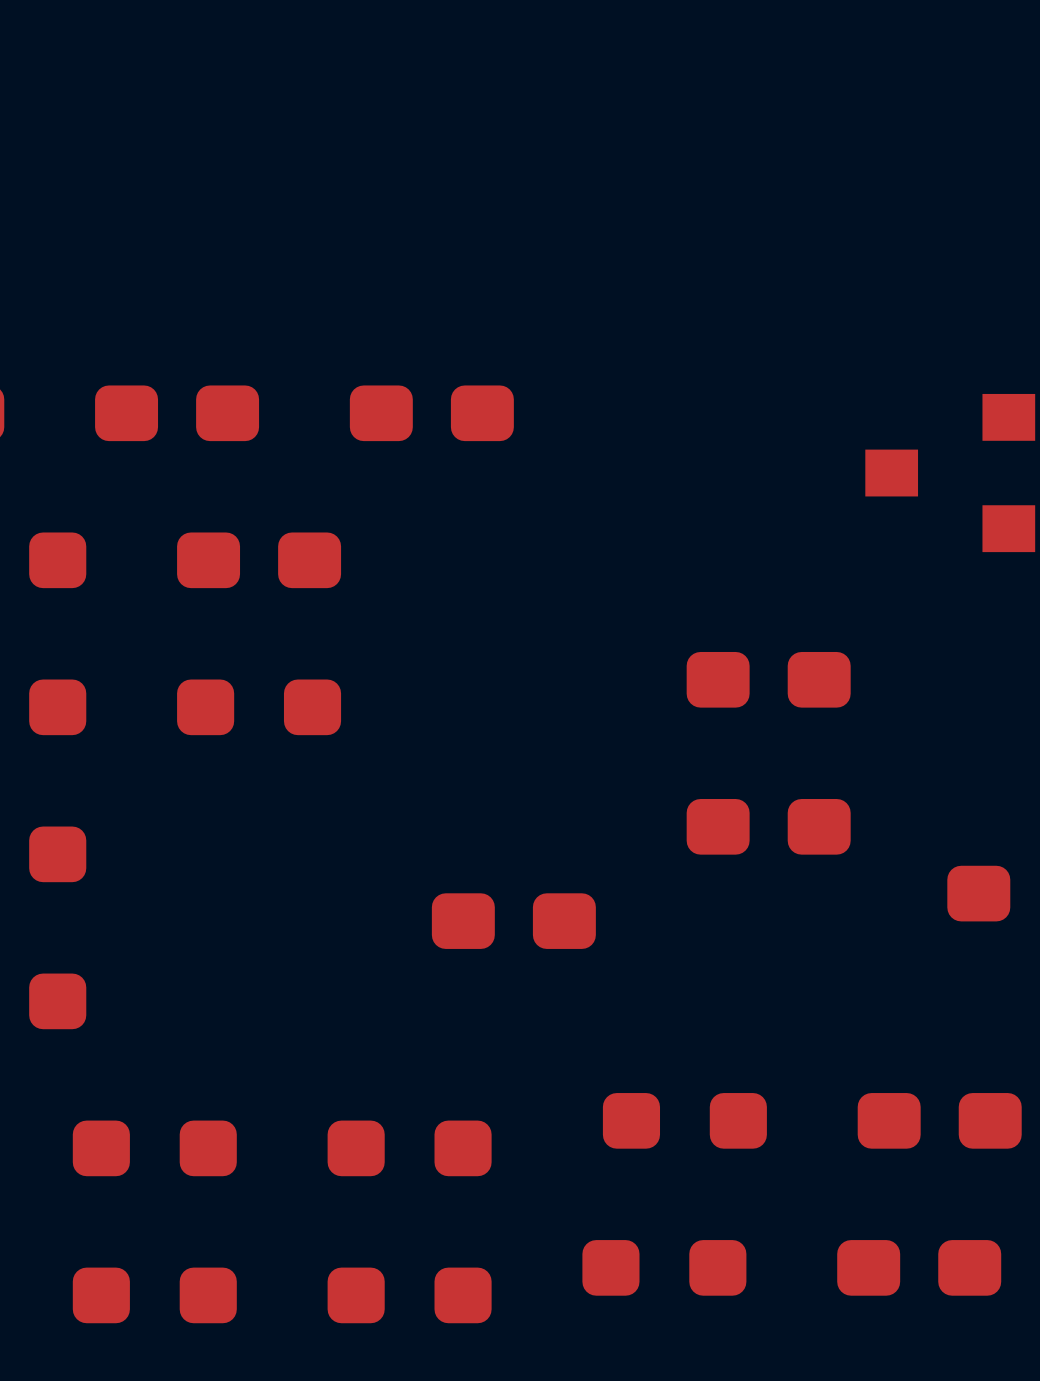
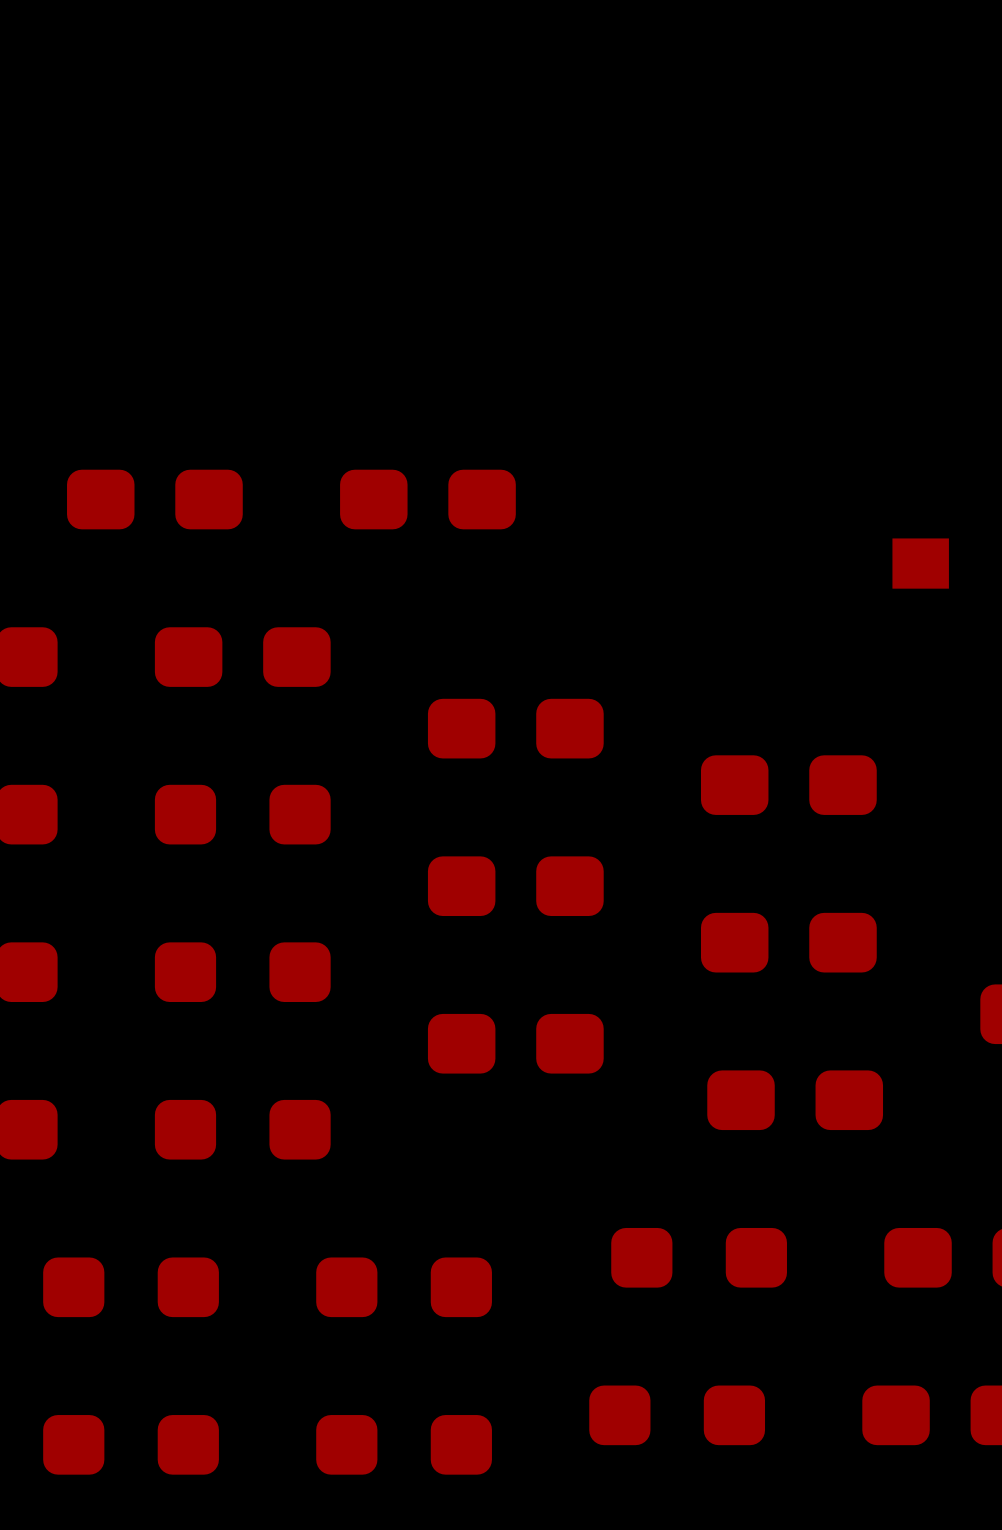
part: none -> (515, 728)
part: none -> (515, 886)
part: none -> (242, 972)
part: none -> (795, 1100)
part: none -> (242, 1129)

